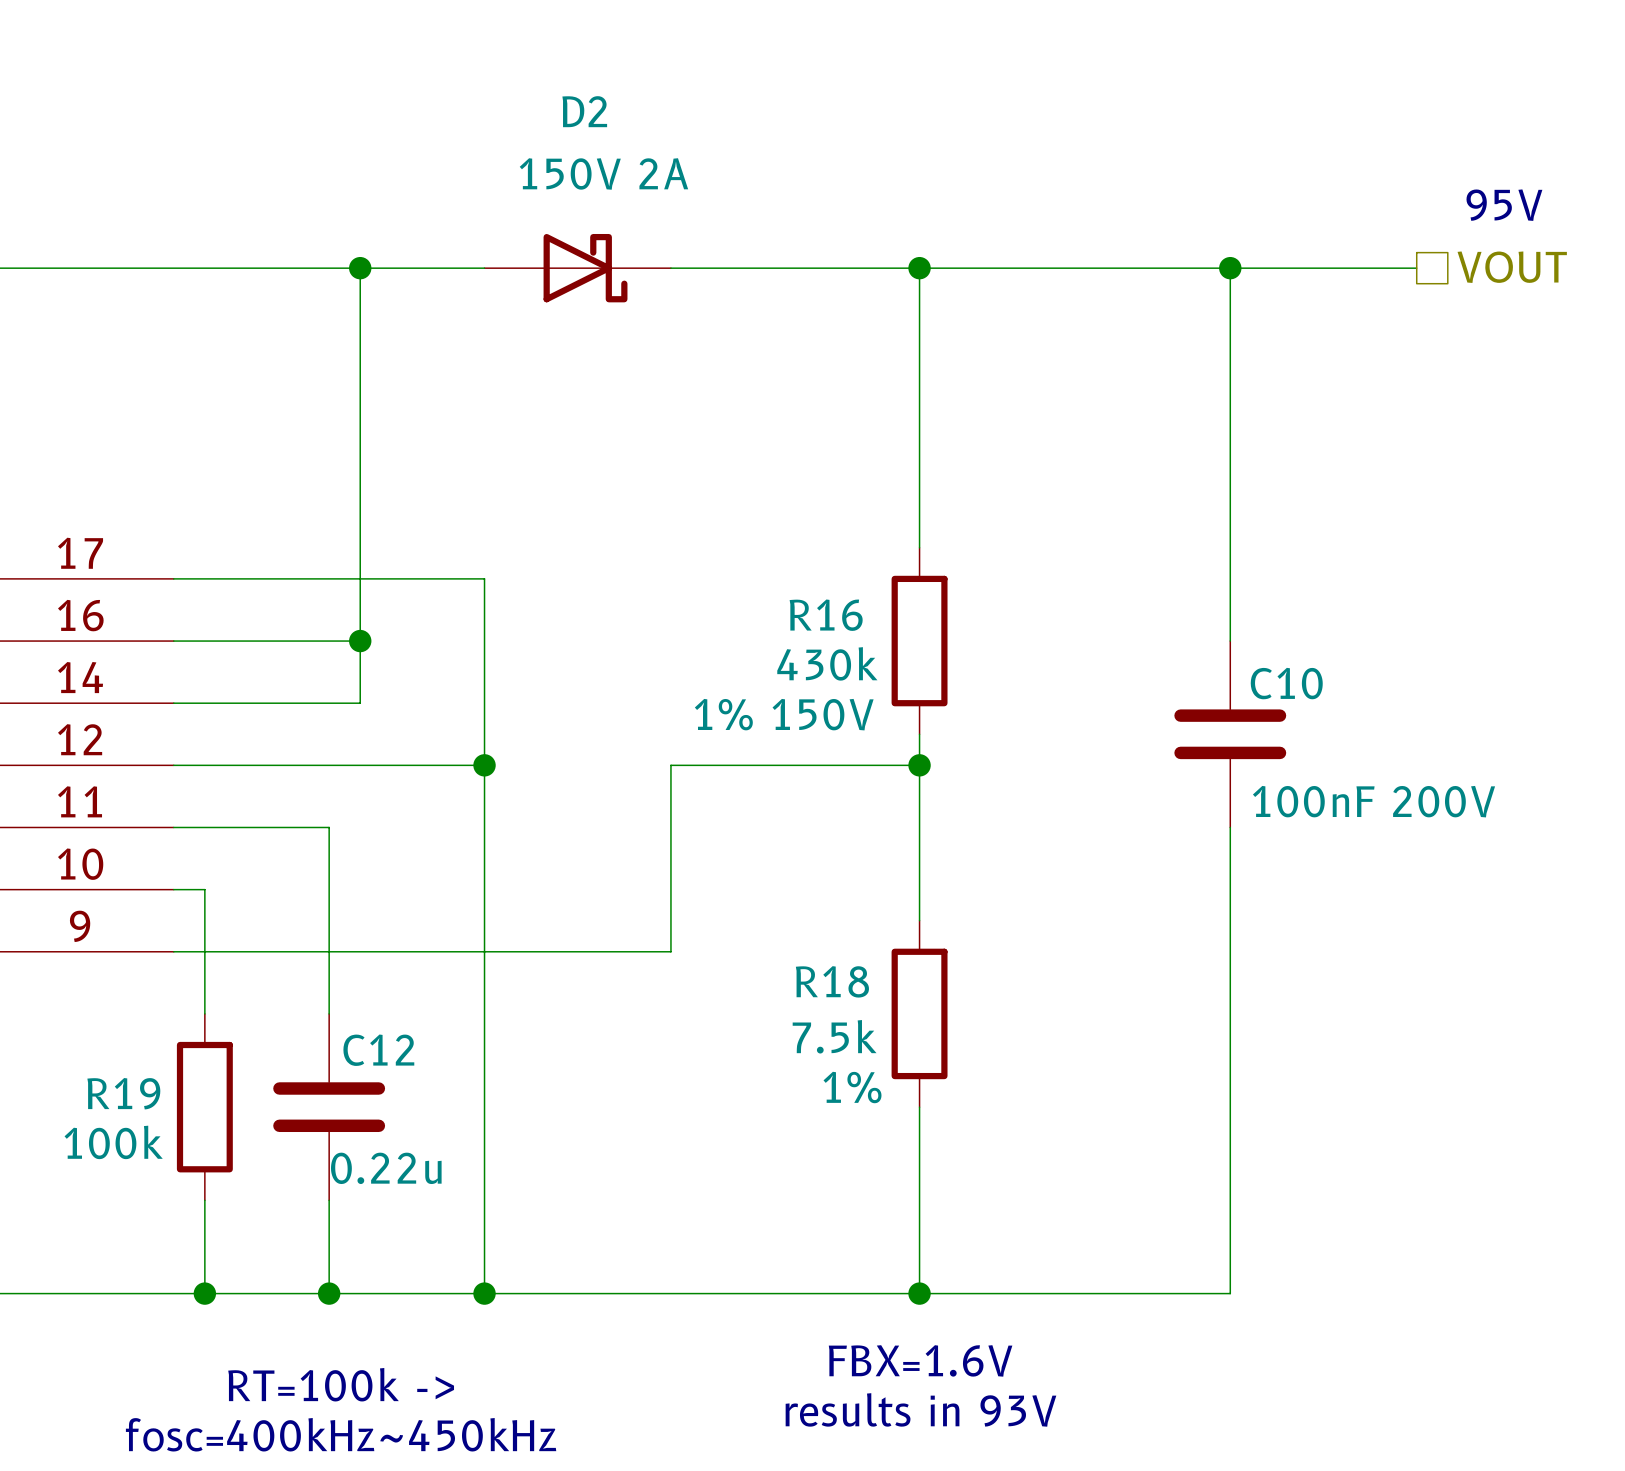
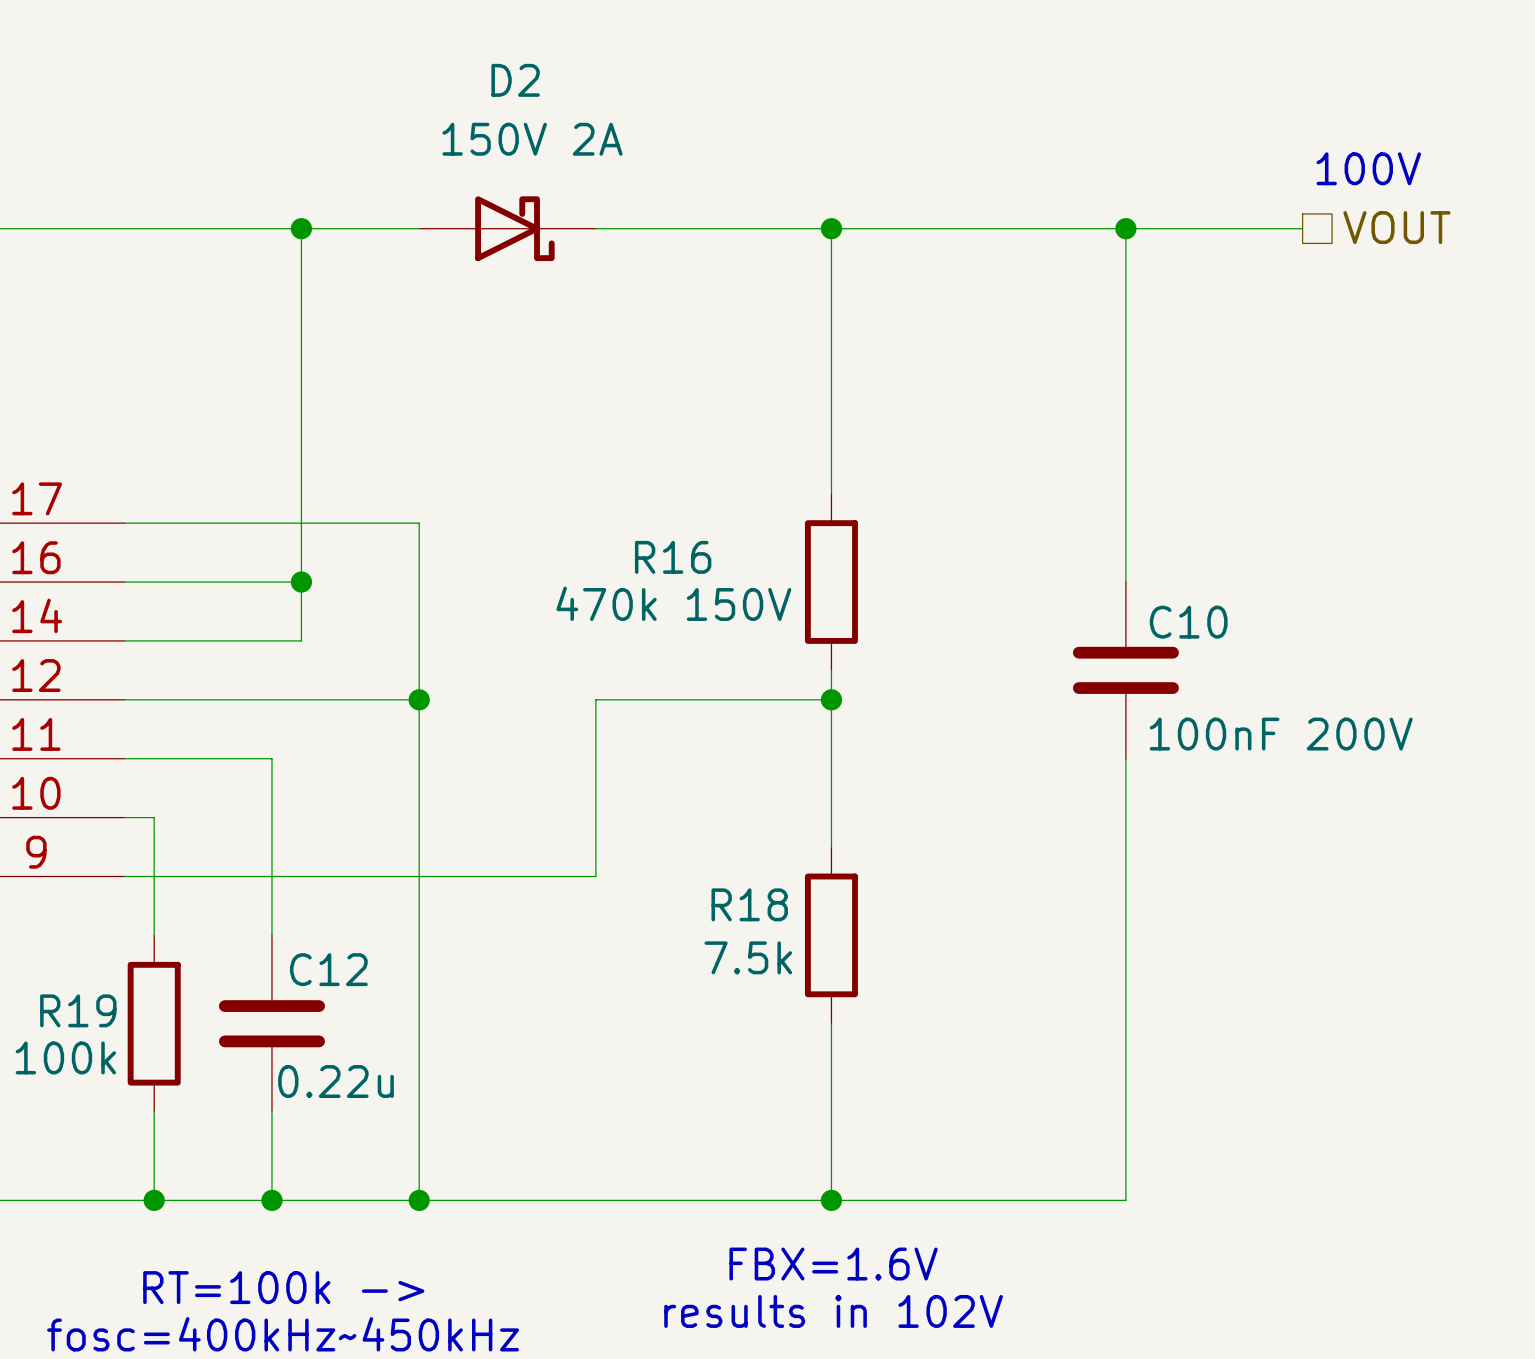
text: 95V (1504, 205) -> 100V (1368, 168)
R16 name position: R16 (826, 615) -> R16 (673, 557)
R16 value: 430k (827, 663) -> 470k 150V (673, 603)
R16 text: 1% 150V (784, 714) -> none
R18 text: 1% (852, 1087) -> none
text: results in 93V (920, 1409) -> results in 102V (833, 1311)

